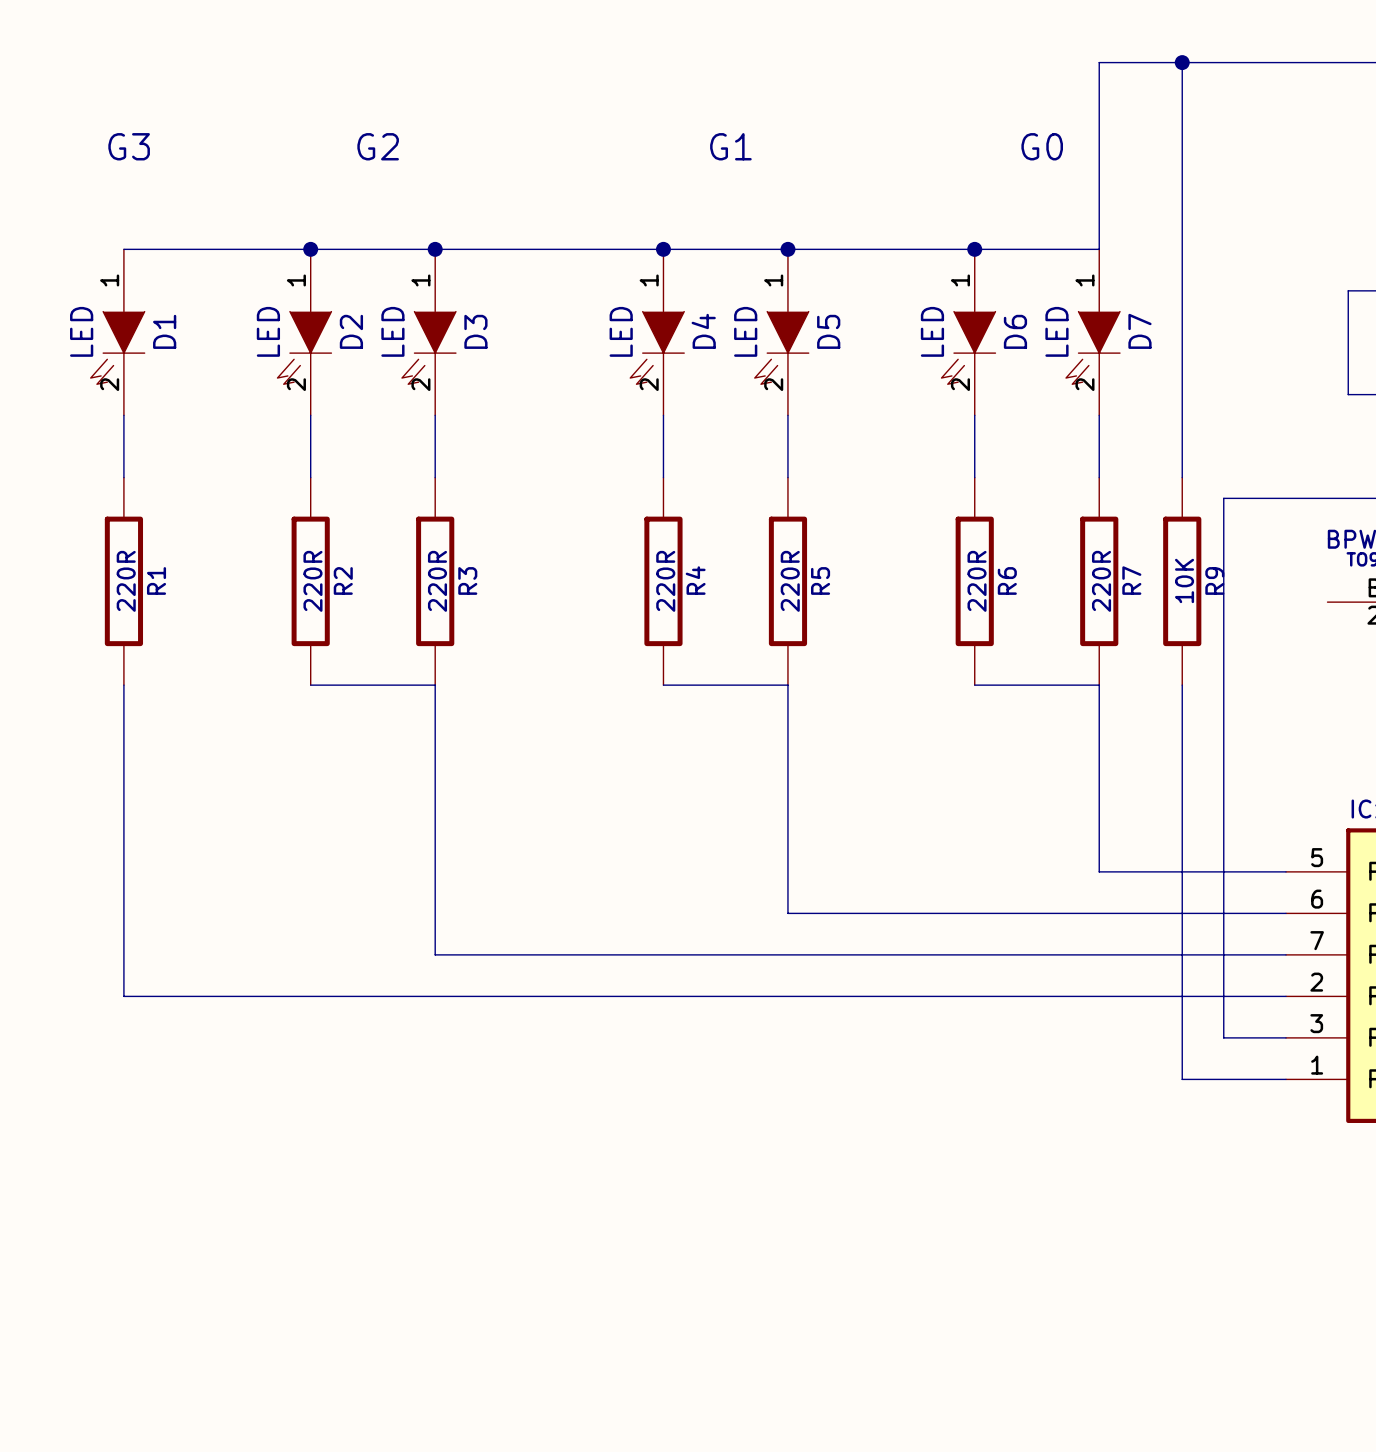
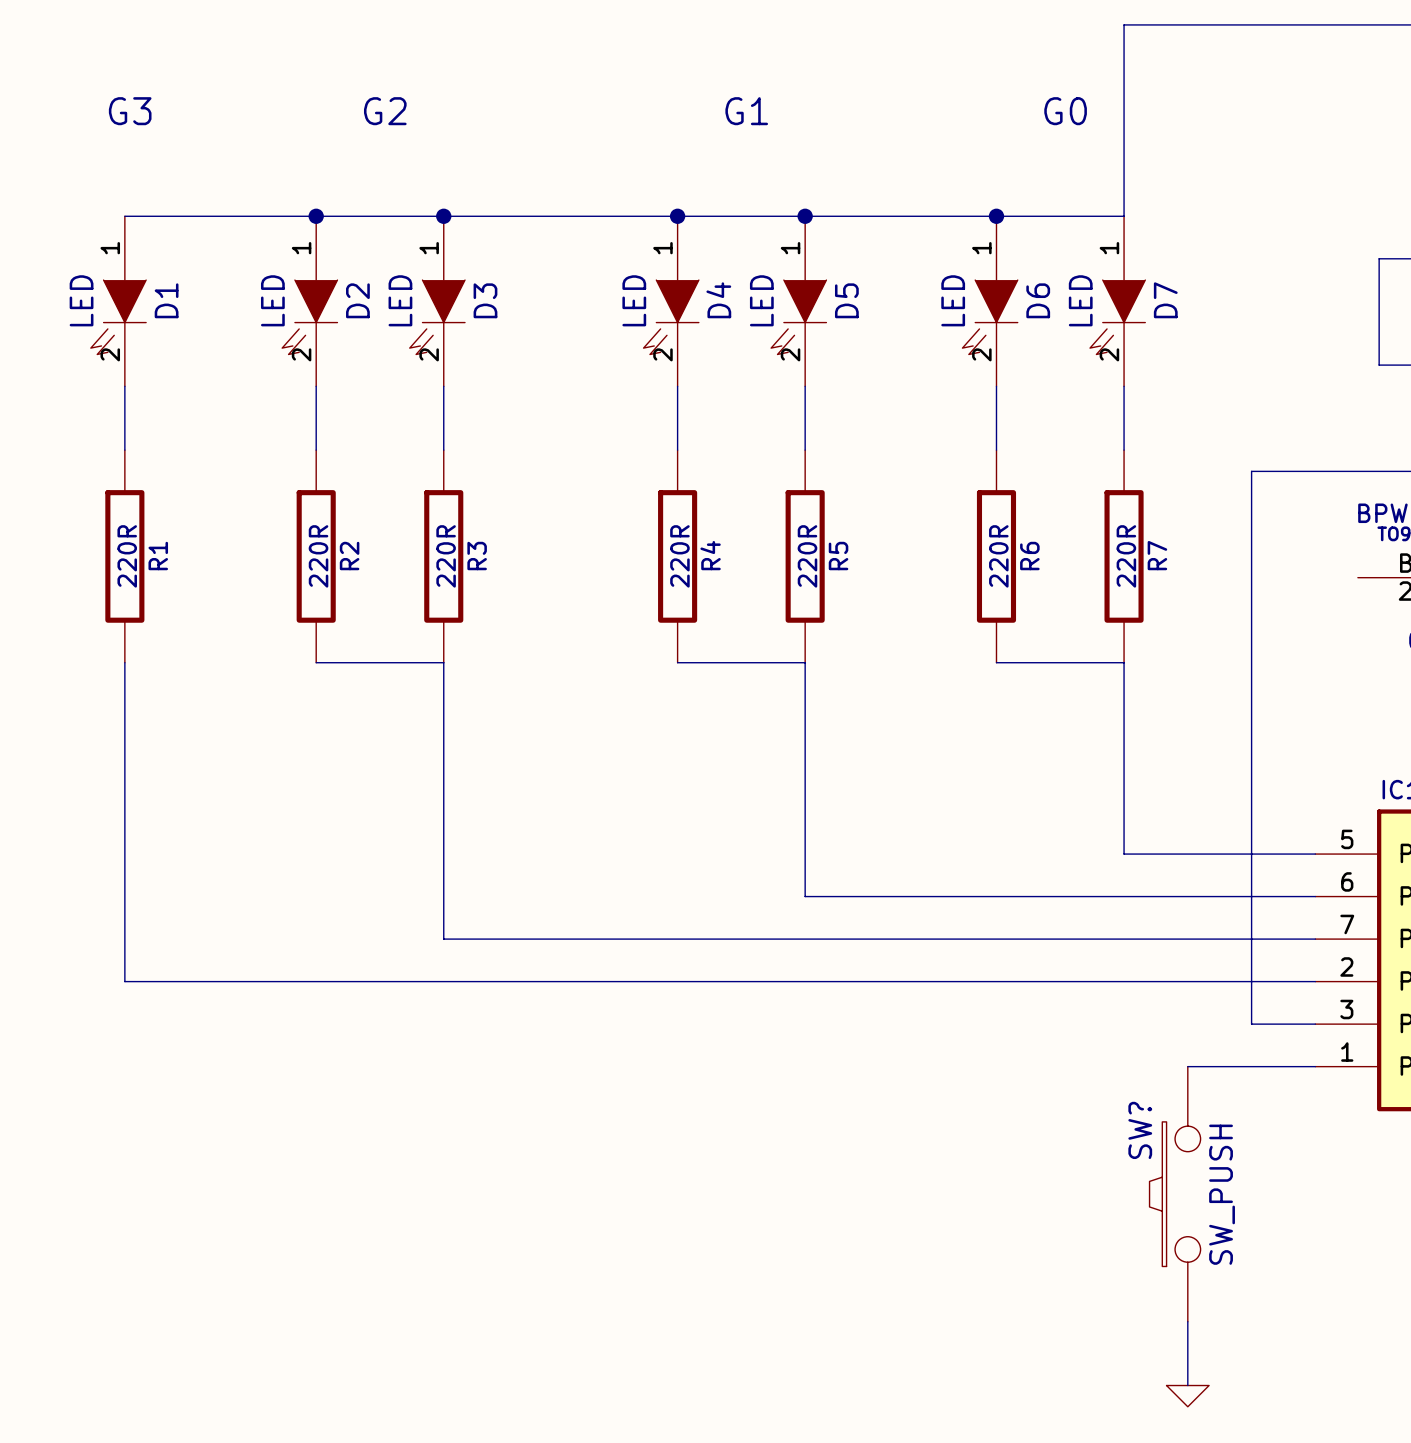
wire: (1182, 62) (1182, 477) -> none
junction: (1182, 62) -> none
R9: 10K (1182, 581) -> none
wire: (1182, 685) (1182, 1079) -> (1187, 1066) (1209, 1066)
SW?: none -> SW_PUSH (1175, 1194)
wire: none -> (1187, 1321) (1187, 1385)
power symbol: none -> (1187, 1396)

